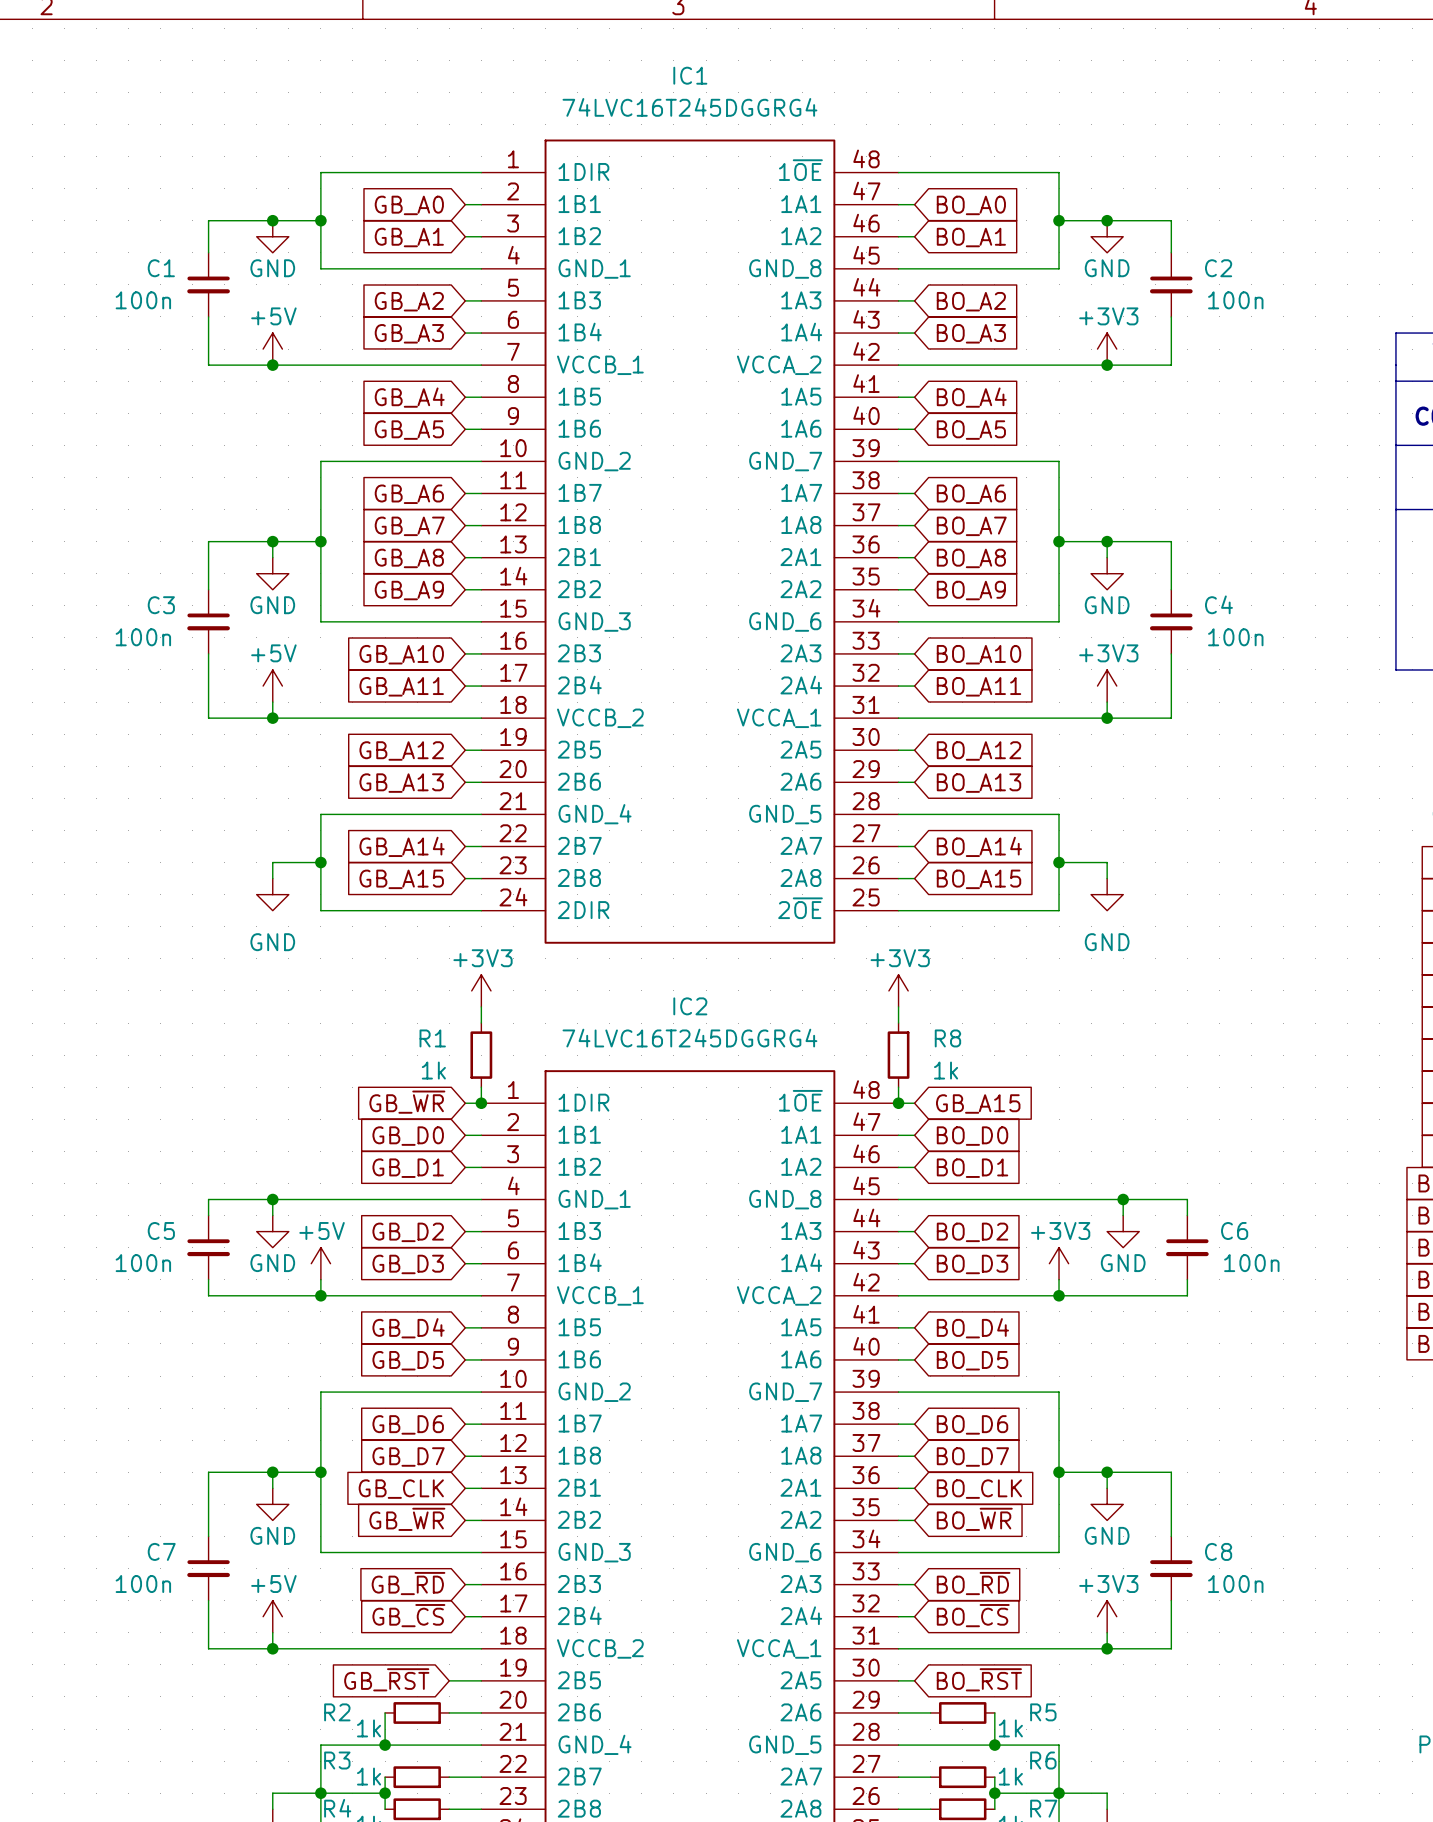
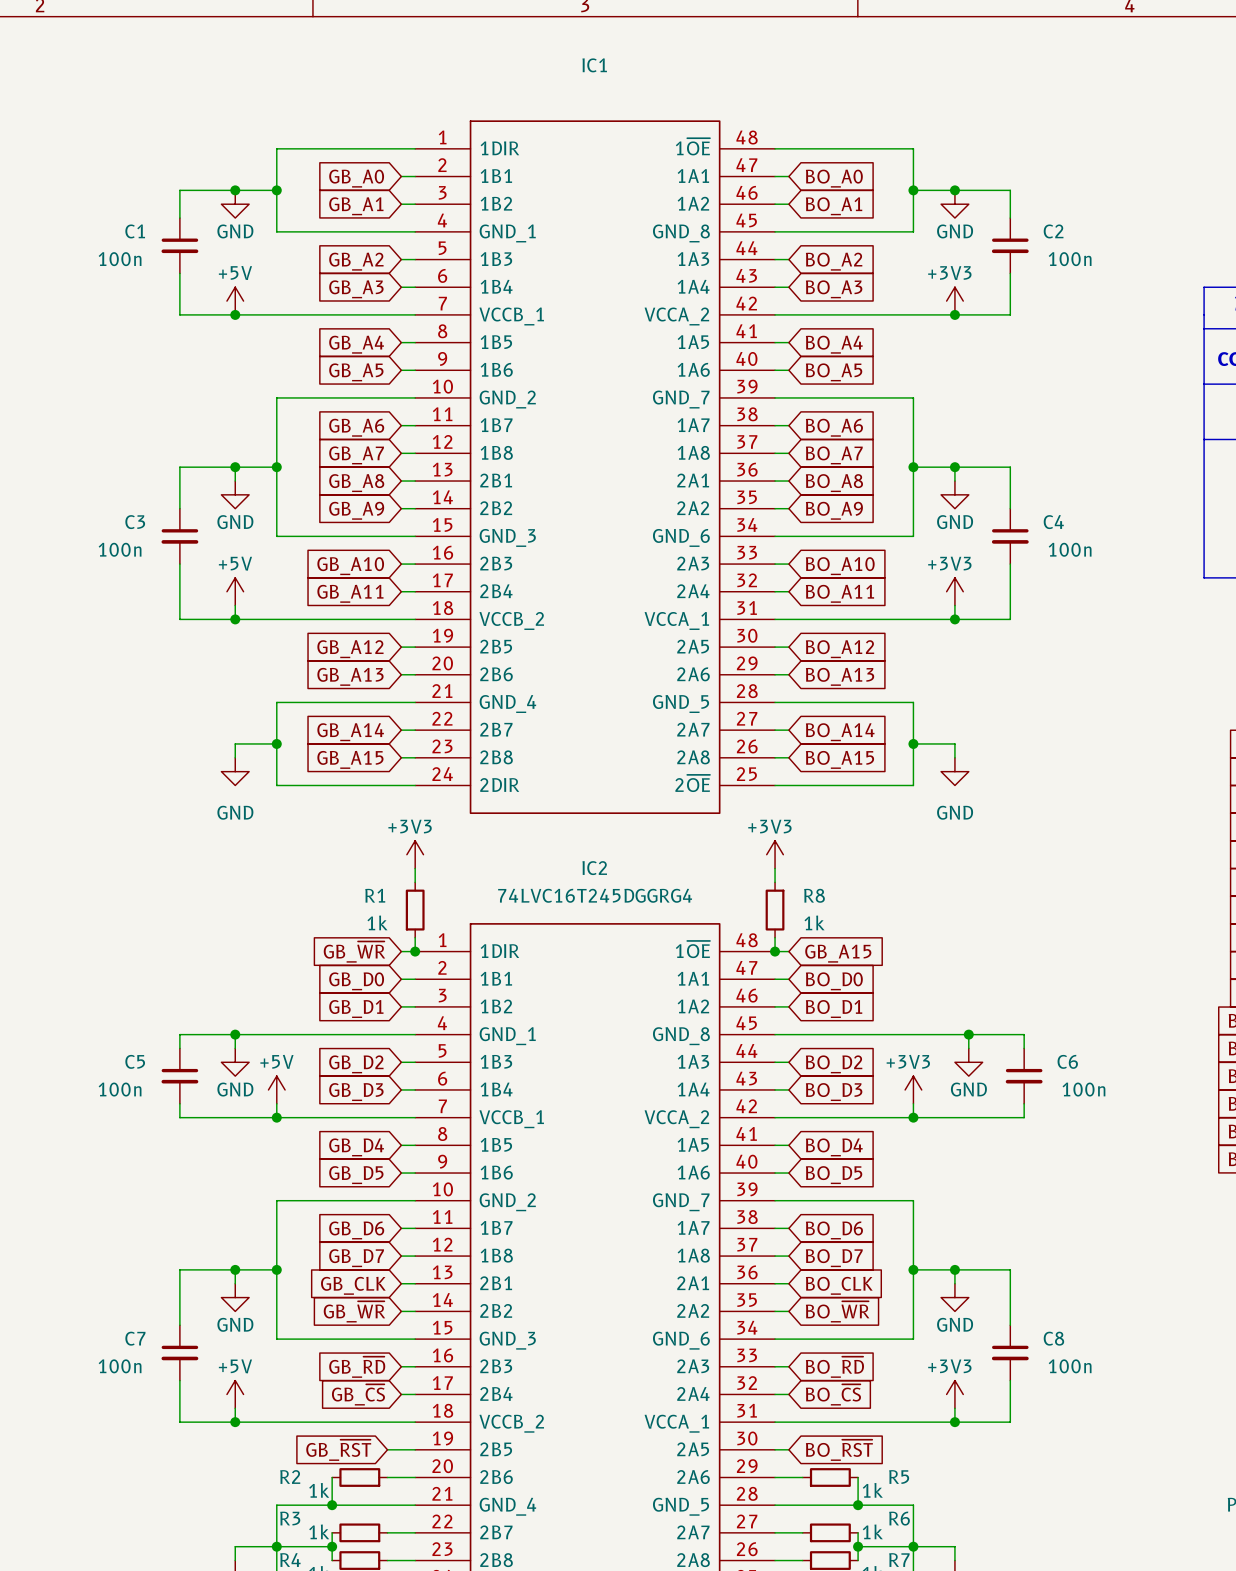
IC1 value: 74LVC16T245DGGRG4 (689, 107) -> none

